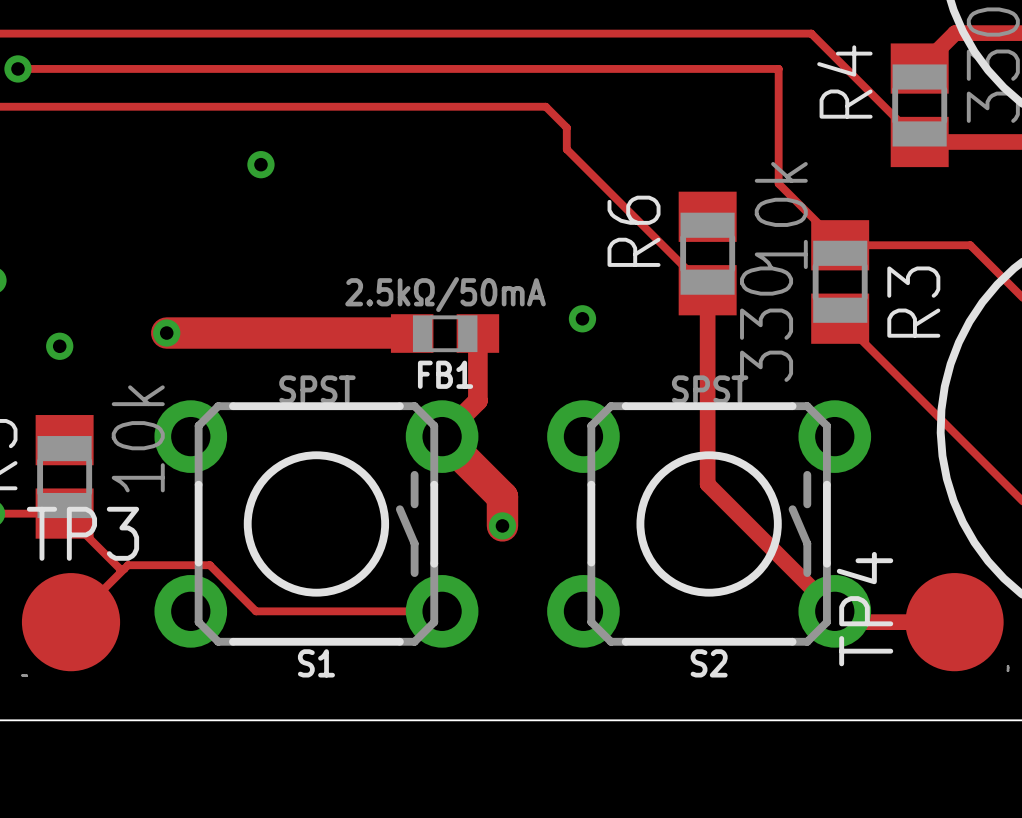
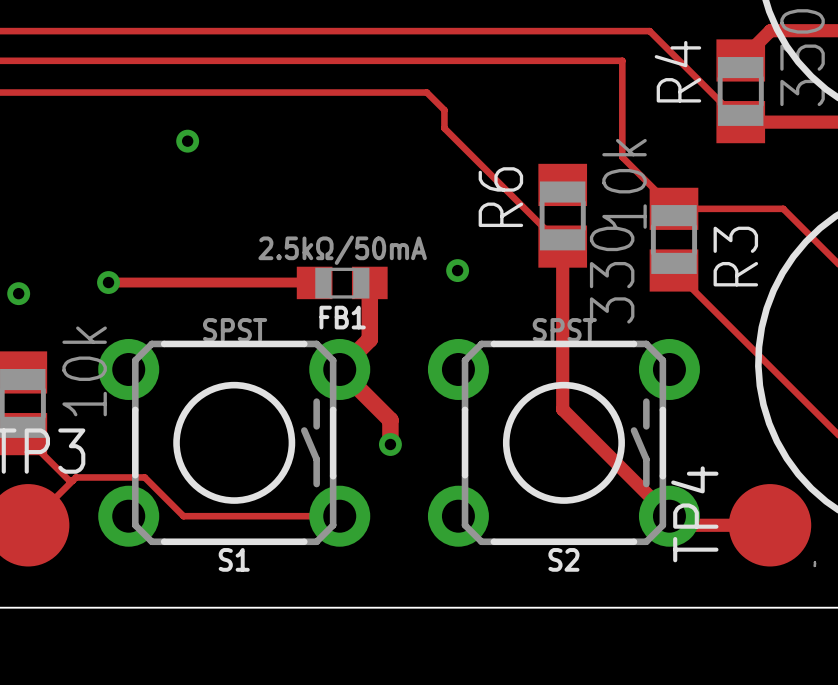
track width: thick (166, 333) (411, 333) -> thin (108, 282) (314, 282)
track width: thick (442, 436) (502, 496) (502, 525) -> thin (339, 369) (390, 420) (390, 444)

